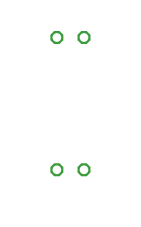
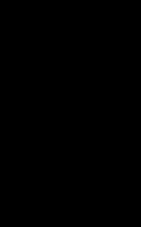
part: (70, 37) -> none
part: (70, 169) -> none

